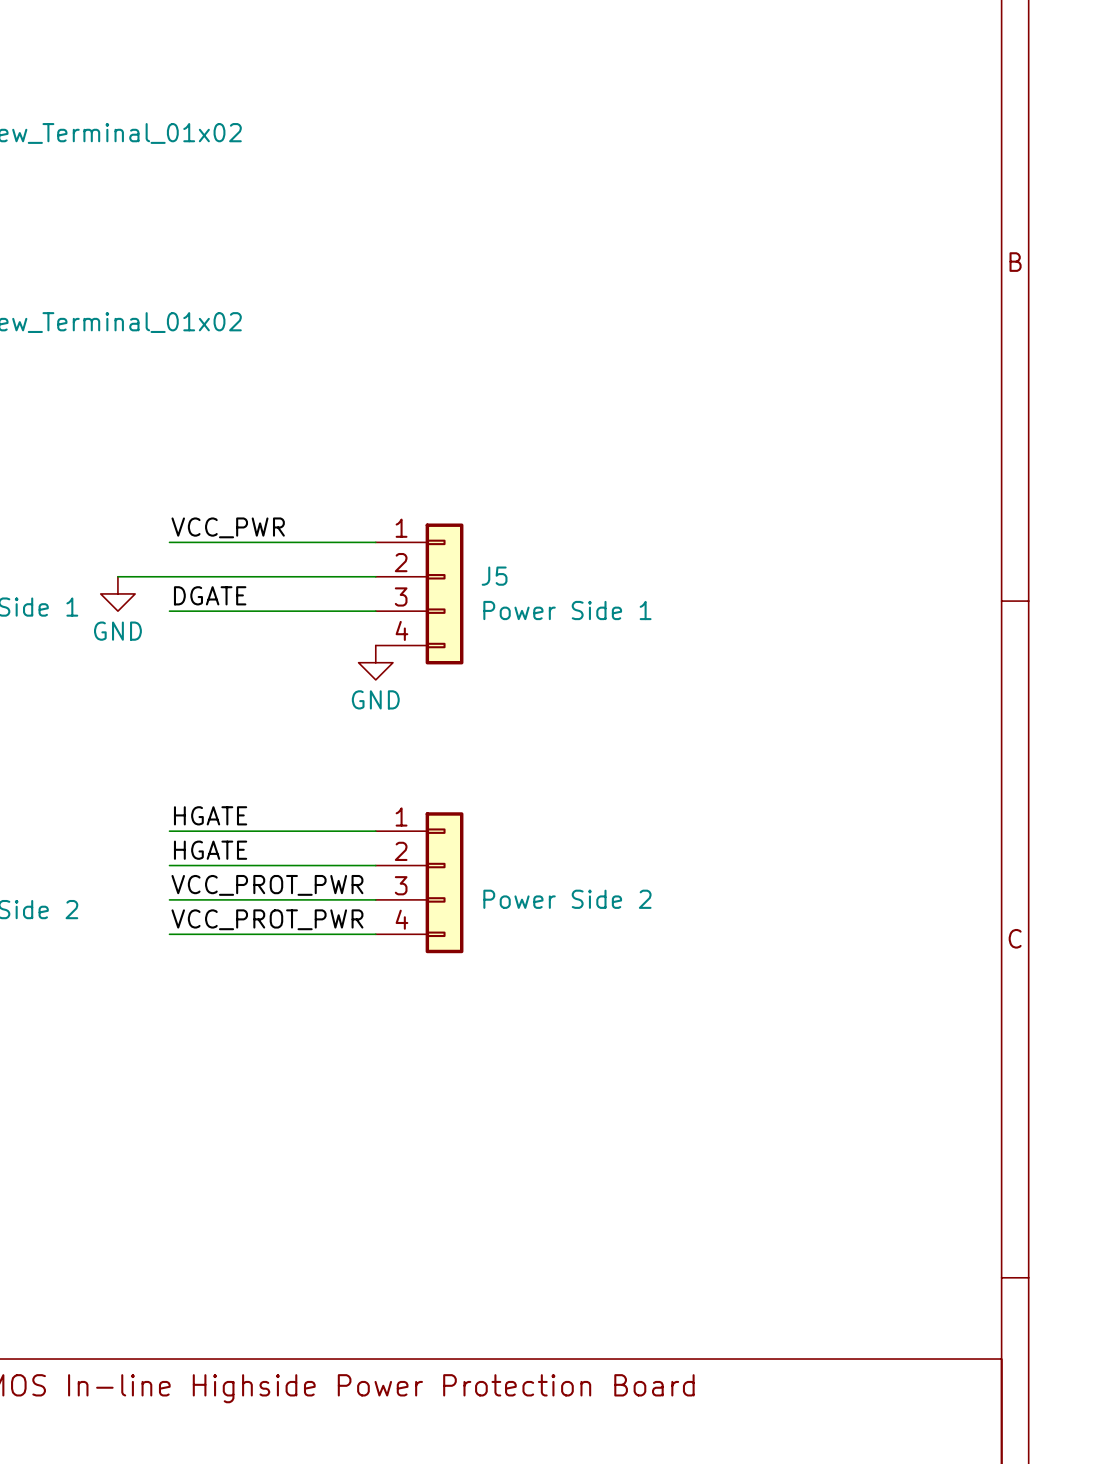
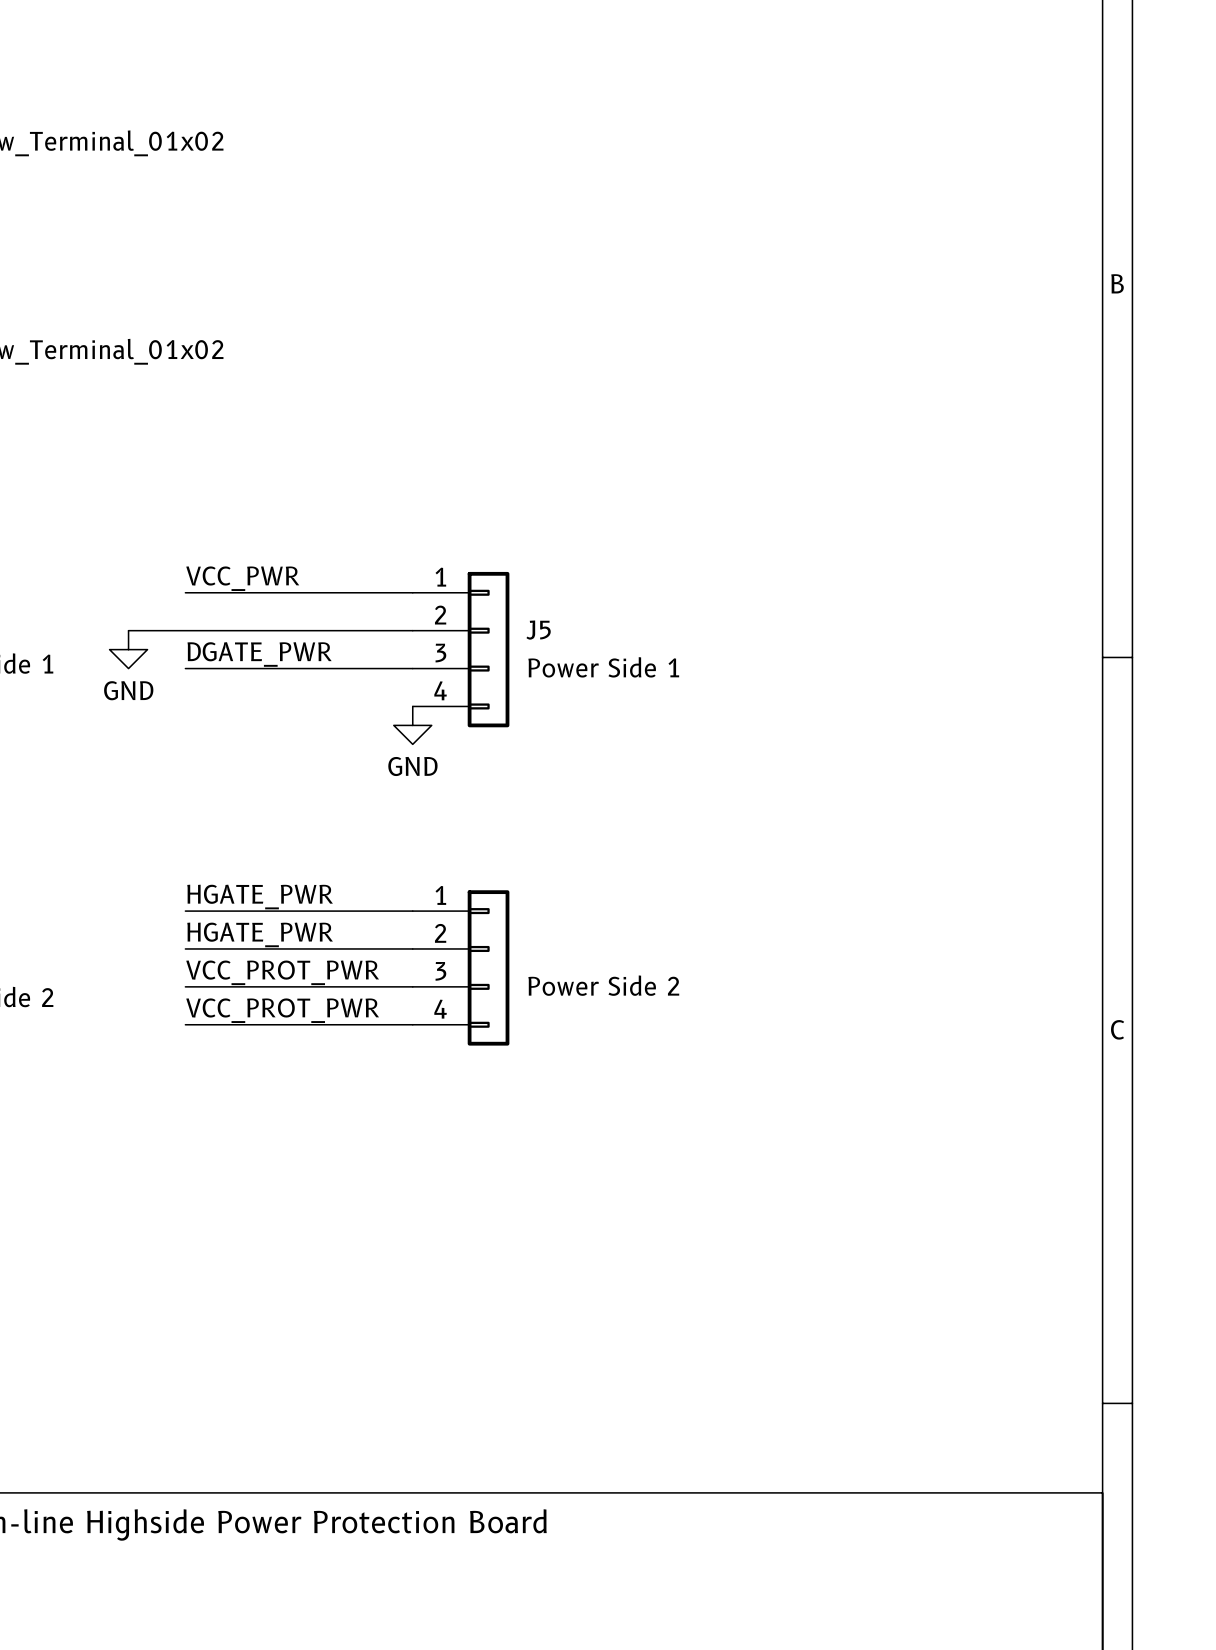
label: DGATE (210, 595) -> DGATE_PWR (259, 654)
label: HGATE (210, 815) -> HGATE_PWR (260, 897)
label: HGATE (210, 850) -> HGATE_PWR (260, 934)

